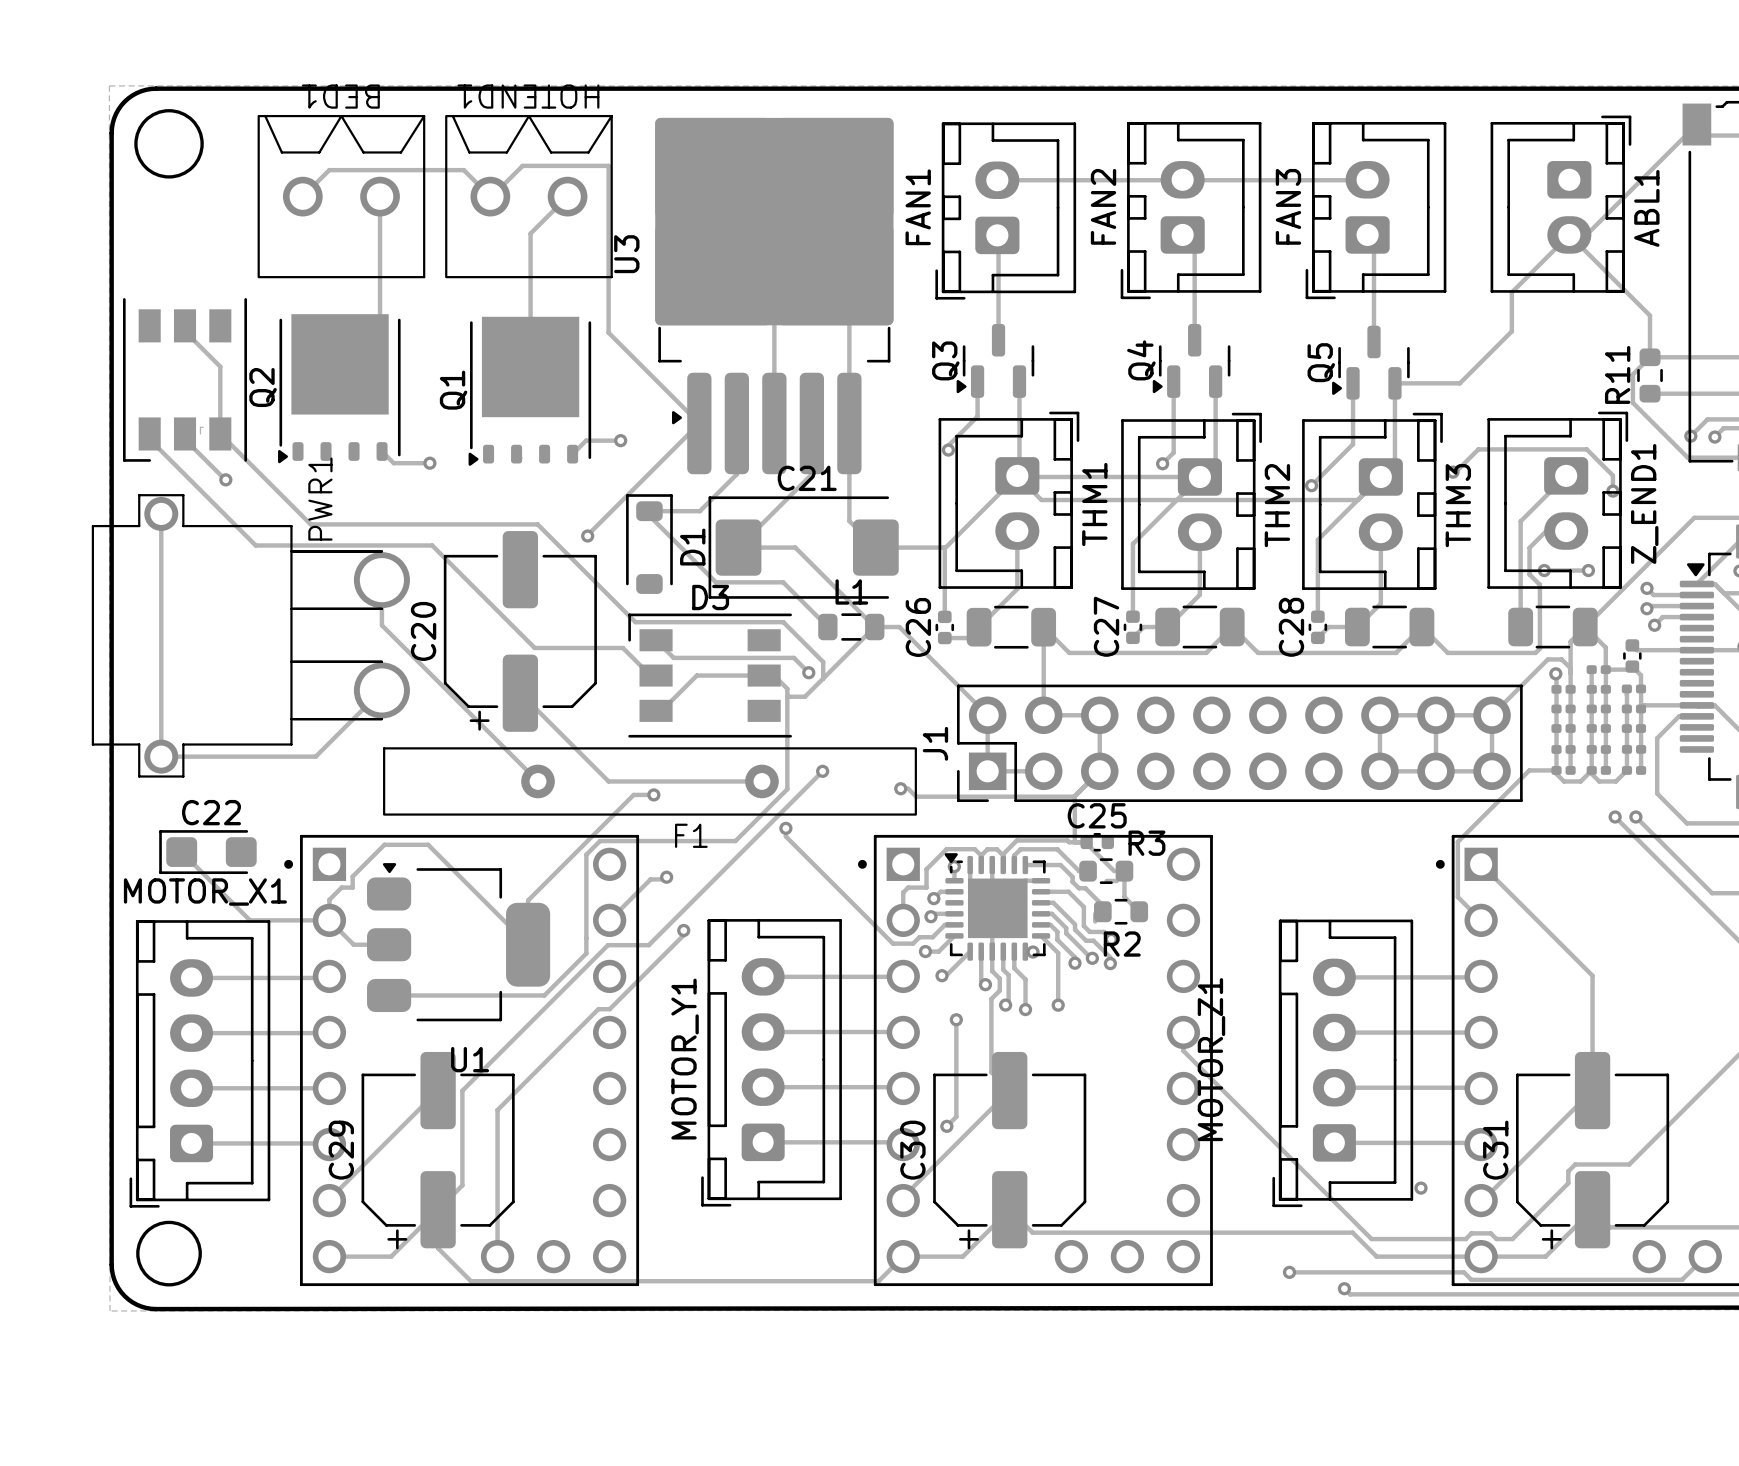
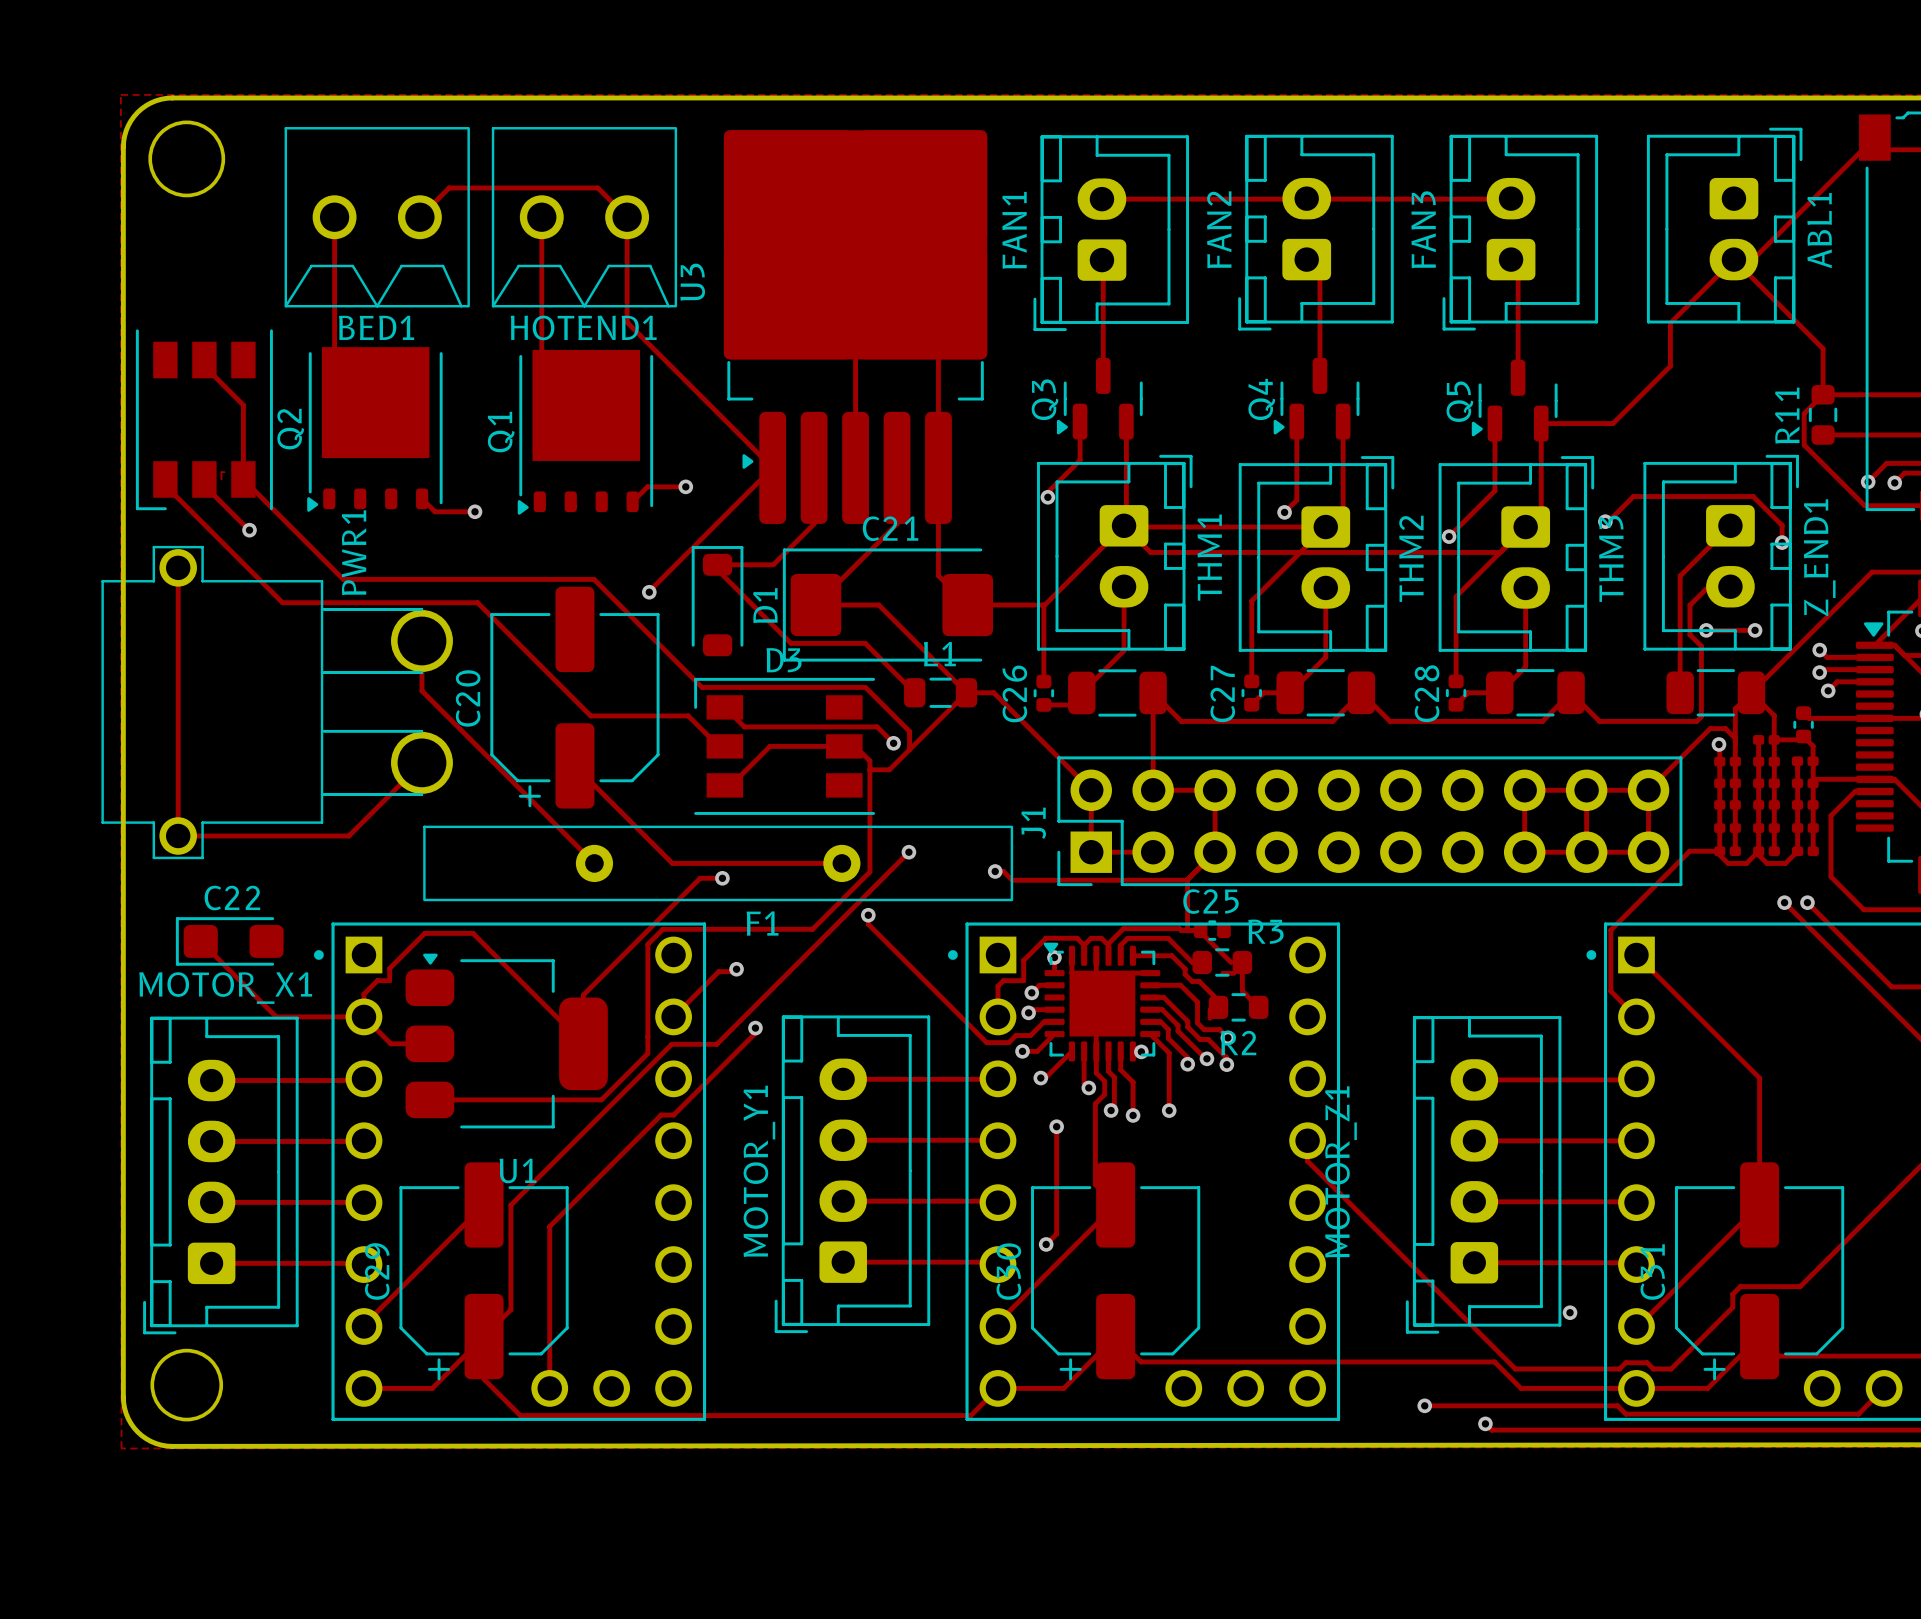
track: (406, 170) (329, 170) (302, 196) -> (449, 187) (419, 217)
track: (463, 170) (491, 196) (522, 165) (608, 165) (608, 332) -> (512, 187) (597, 187) (627, 217) (627, 322) (672, 367)
track: none -> (334, 217) (334, 361)
BED1 rotation: 0° (341, 196) -> 180° (377, 217)
track: (380, 196) (380, 324) (340, 364) -> none
track: none -> (541, 217) (541, 361)
HOTEND1 rotation: 0° (528, 196) -> 180° (584, 217)
track: (567, 196) (530, 233) (530, 366) -> none

